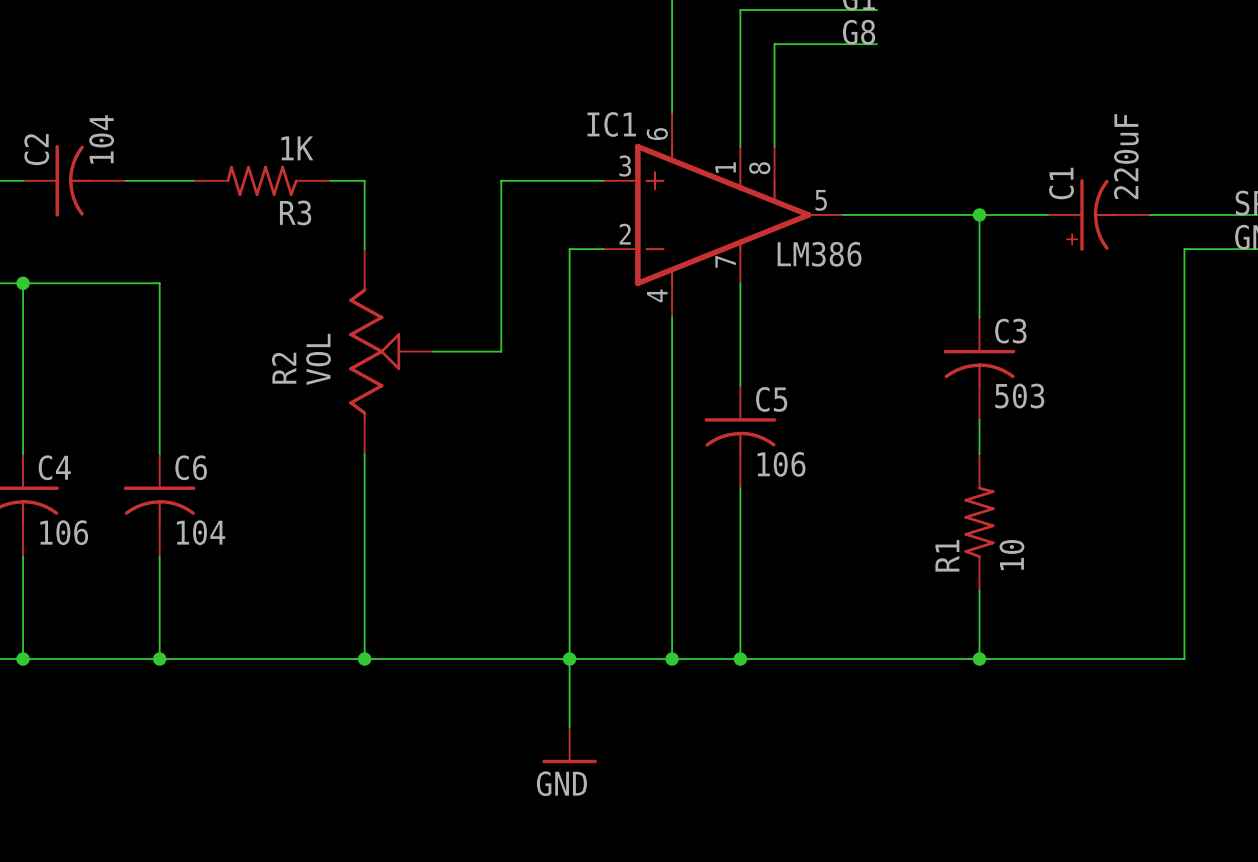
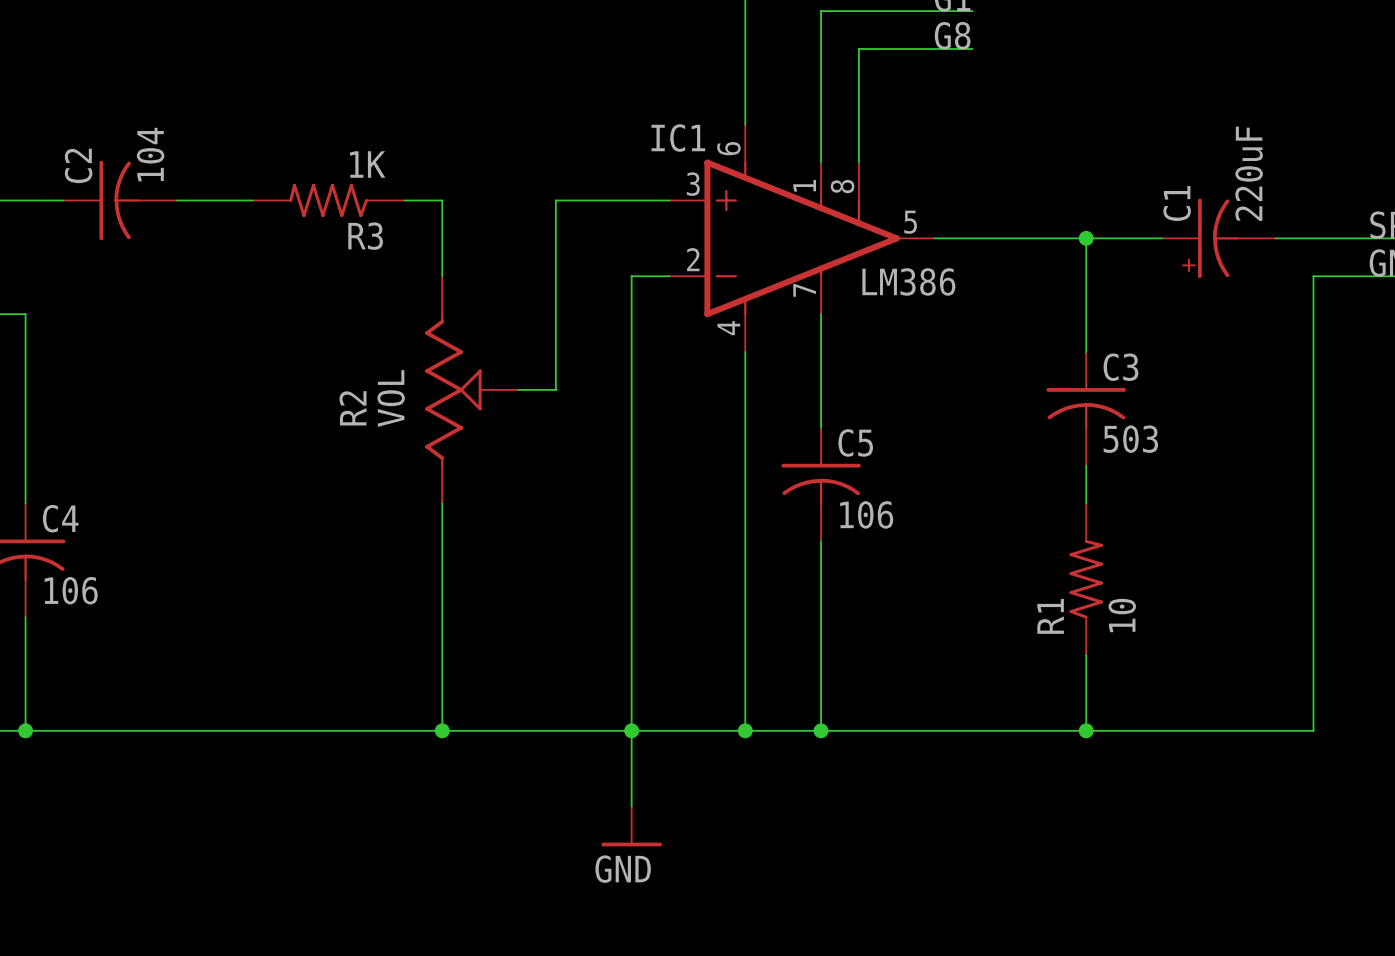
C2 position: (74, 180) -> (120, 200)
R3 position: (262, 180) -> (328, 200)
wire: (330, 180) (364, 180) (364, 249) -> (404, 200) (442, 200) (442, 276)
wire: (23, 283) (159, 283) (159, 454) -> none
junction: (23, 283) -> none
R2 position: (391, 351) -> (471, 389)
wire: (364, 454) (364, 659) -> (442, 503) (442, 730)
C6: 104 (159, 505) -> none
wire: (159, 556) (159, 659) -> none
junction: (159, 659) -> none
junction position: (364, 659) -> (442, 730)

